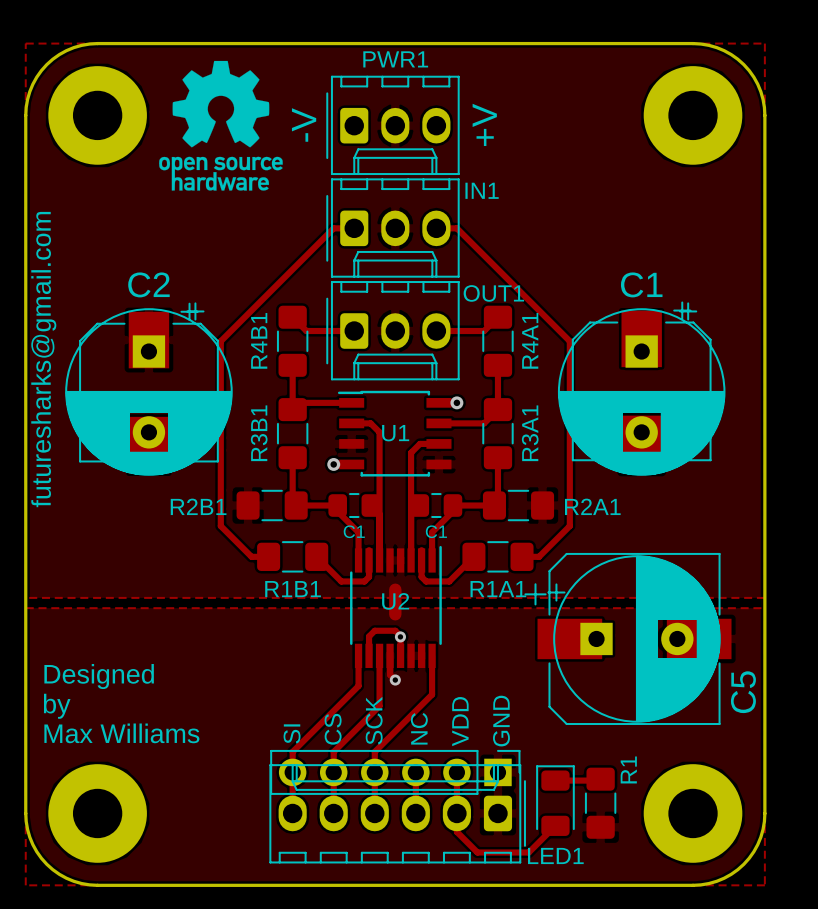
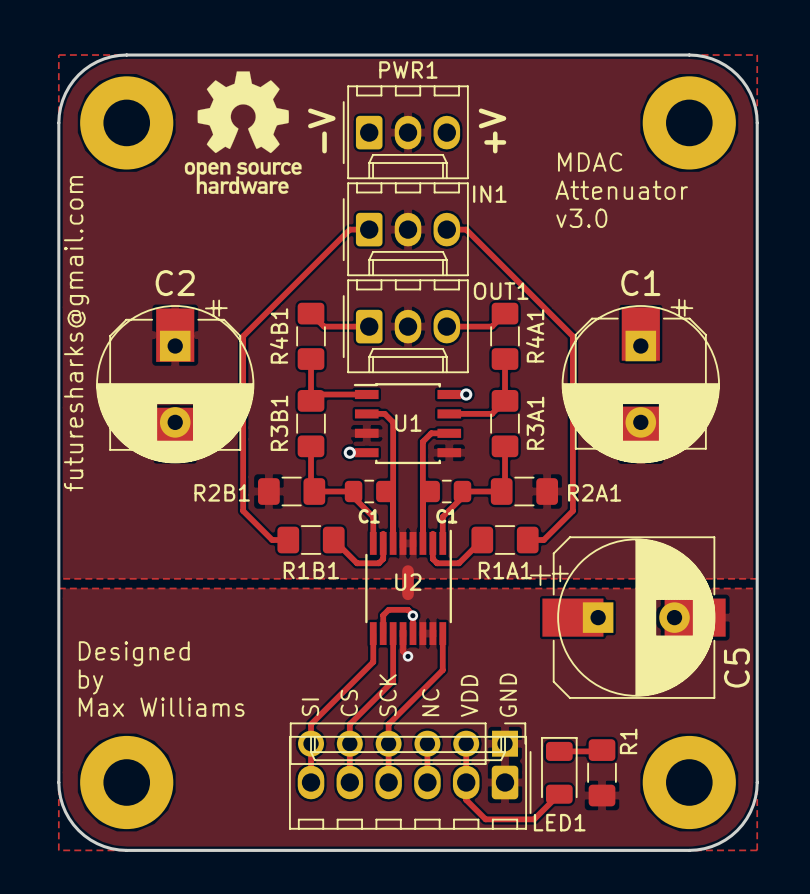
text: none -> MDAC (590, 162)
text: none -> Attenuator (621, 190)
text: none -> v3.0 (581, 218)

